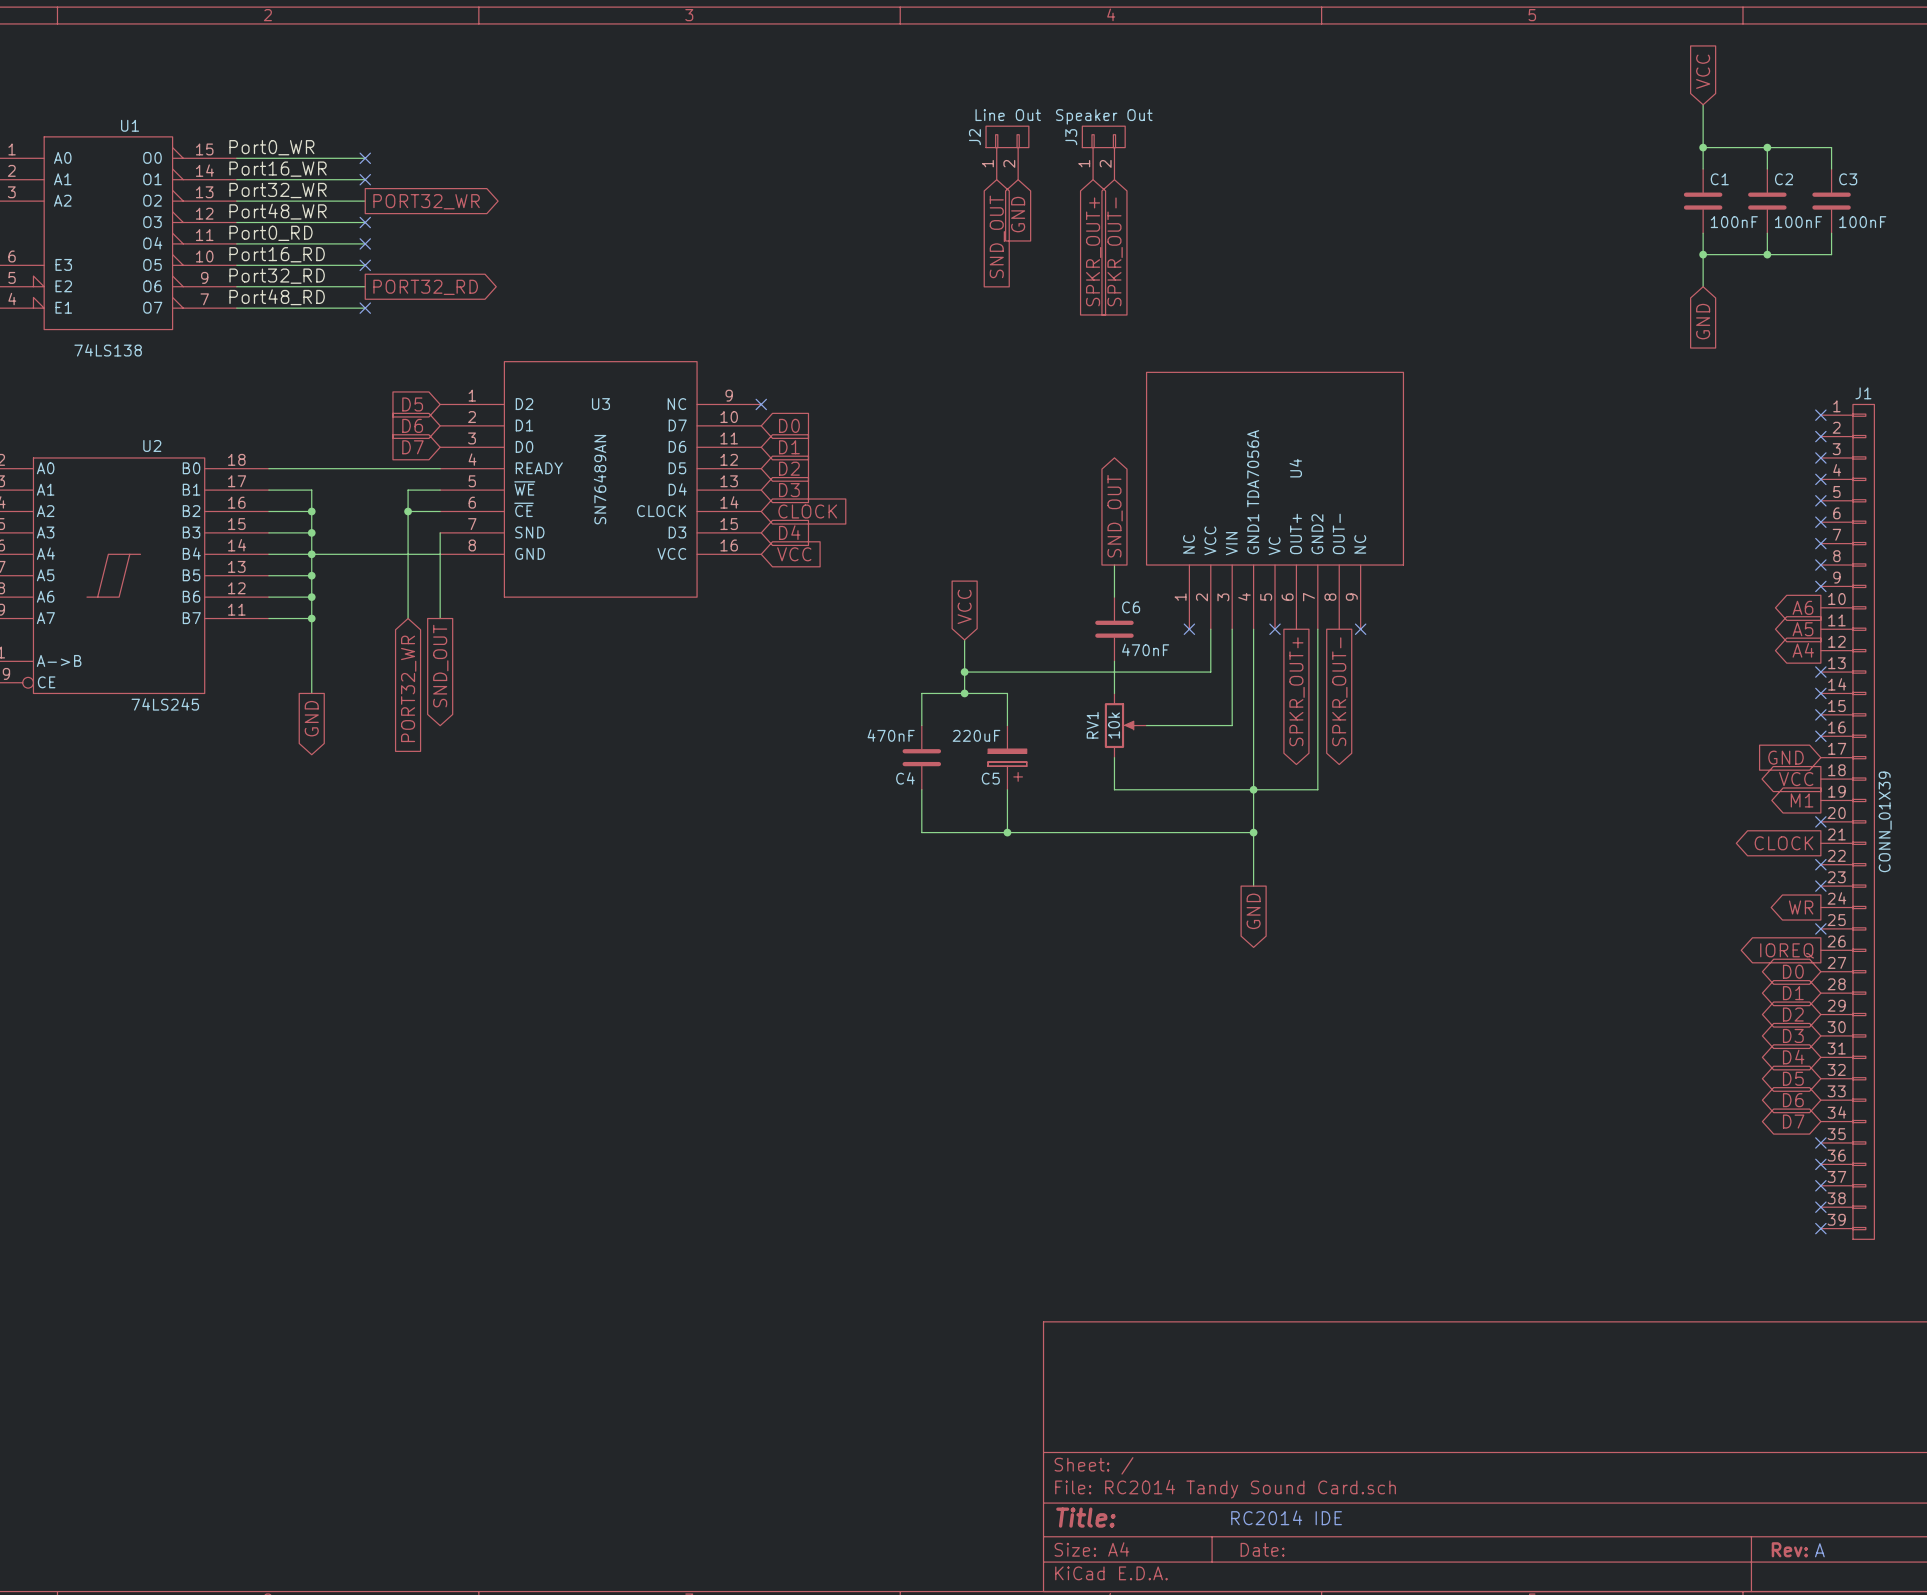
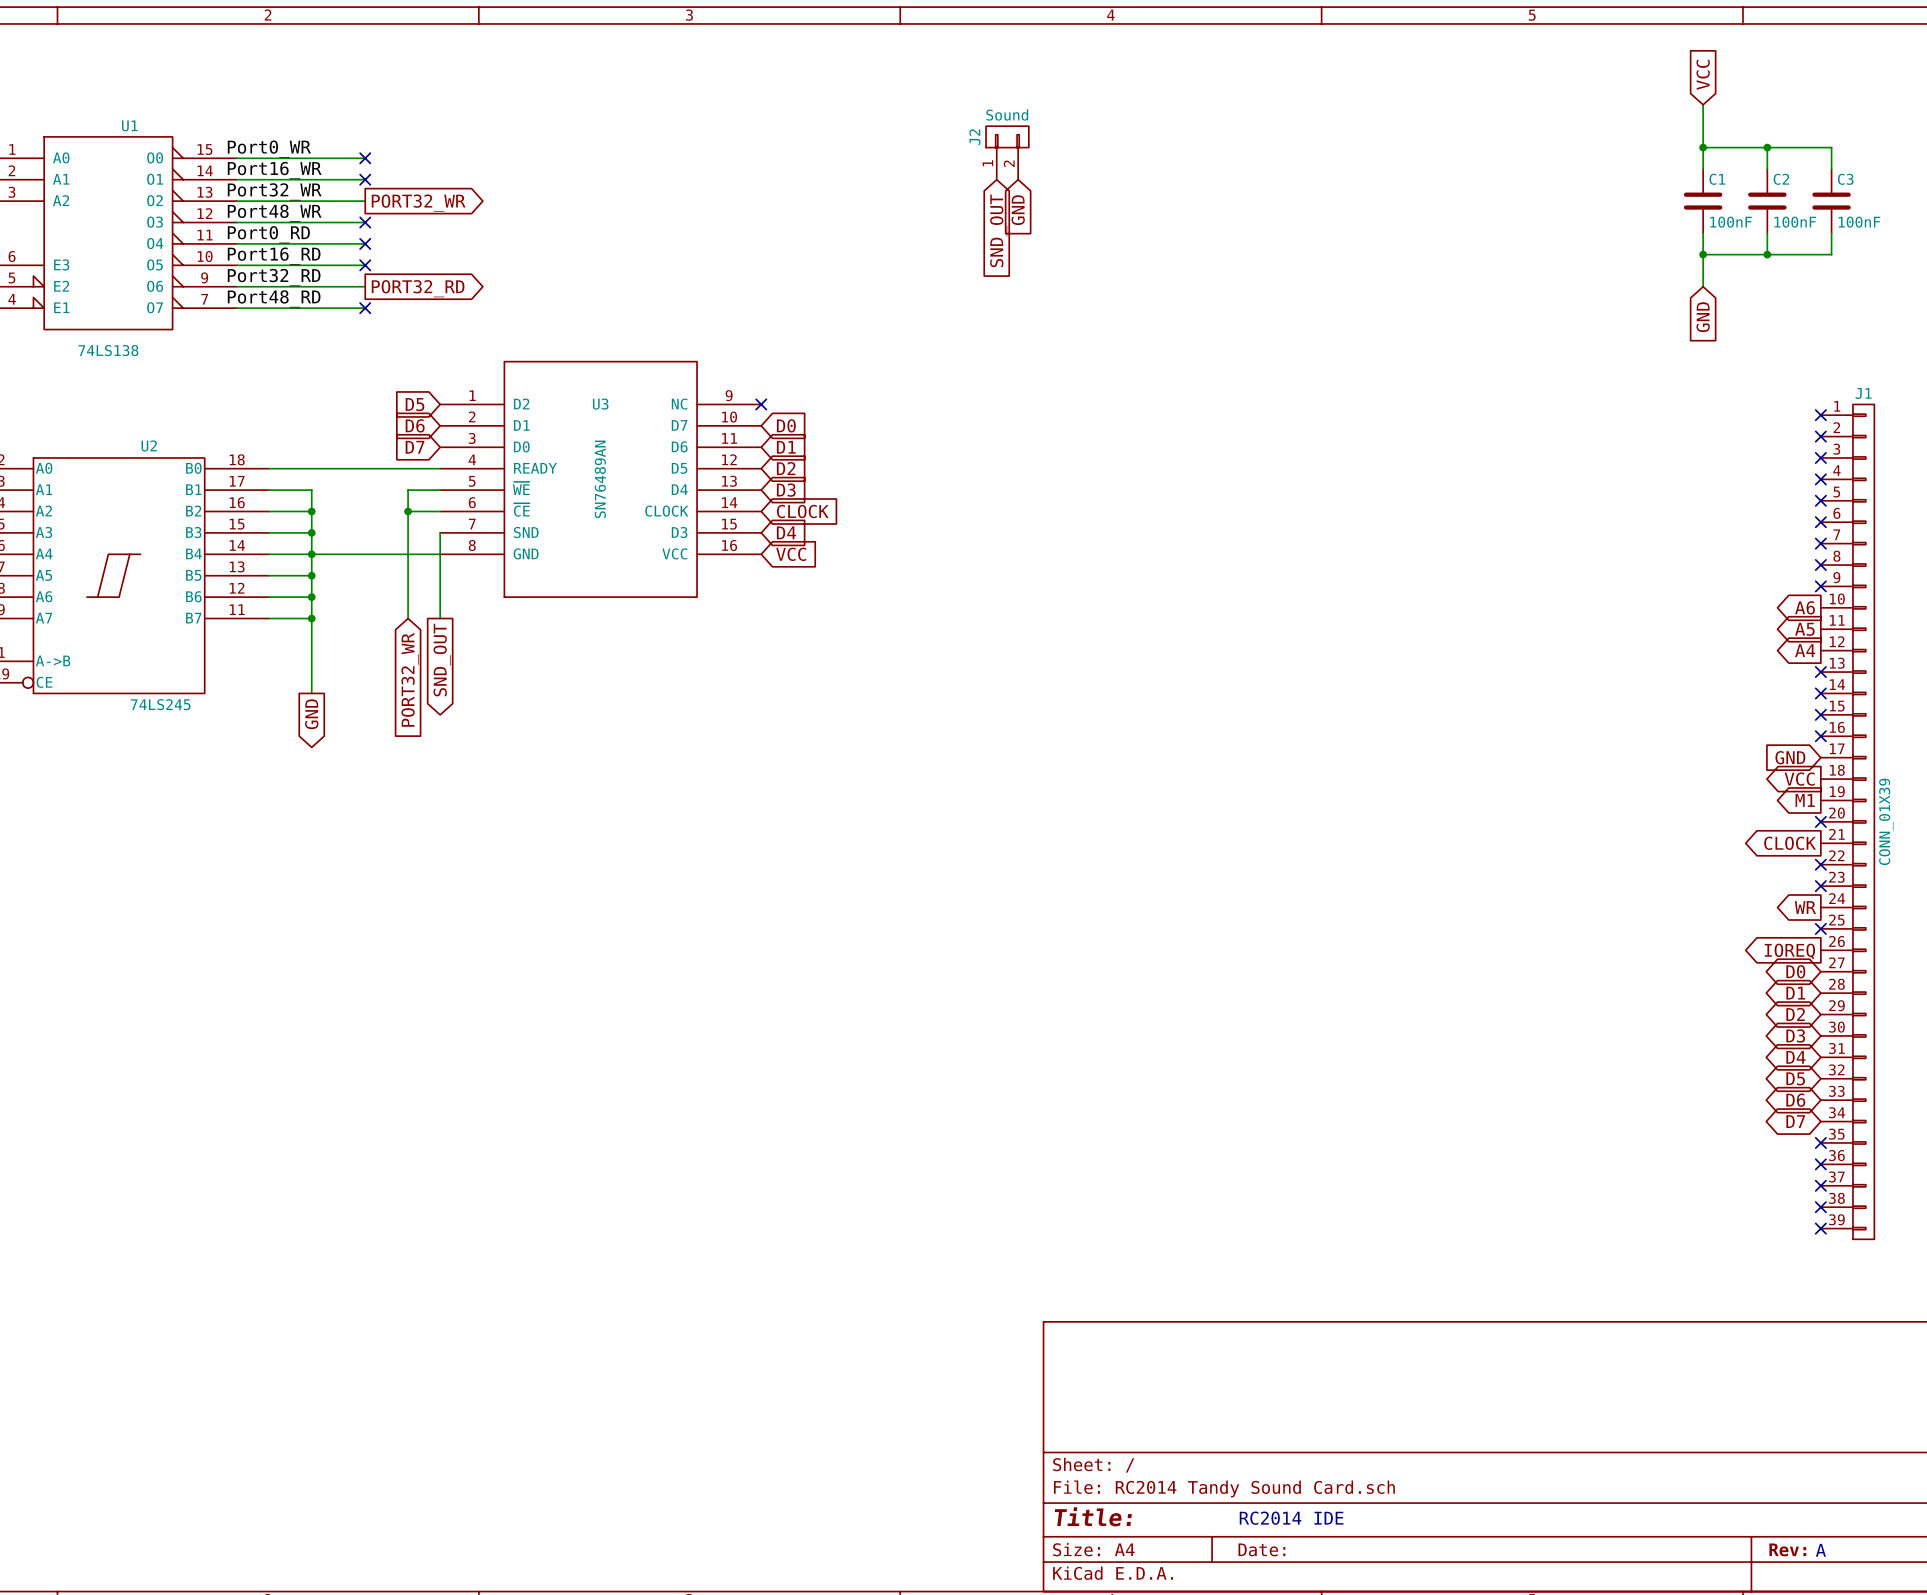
J2 value: Line Out (1008, 115) -> Sound (1007, 114)
J3: Speaker Out (1103, 152) -> none
global label: SPKR_OUT+ (1093, 251) -> none
global label: SPKR_OUT- (1115, 251) -> none
U4: TDA7056A (1275, 500) -> none
global label: SND_OUT (1115, 516) -> none
wire: (1114, 565) (1114, 597) -> none
global label: VCC (964, 606) -> none
C6: 470nF (1114, 629) -> none
no-connect mark: (1189, 629) -> none
wire: (1210, 629) (1210, 672) (964, 672) -> none
wire: (1232, 629) (1232, 725) (1146, 725) -> none
wire: (1253, 629) (1253, 886) -> none
no-connect mark: (1275, 629) -> none
wire: (1317, 629) (1317, 789) (1114, 789) (1114, 757) -> none
no-connect mark: (1360, 629) -> none
wire: (964, 639) (964, 693) -> none
wire: (1114, 661) (1114, 693) -> none
junction: (964, 672) -> none
global label: SPKR_OUT+ (1297, 691) -> none
global label: SPKR_OUT- (1339, 691) -> none
junction: (964, 693) -> none
wire: (921, 725) (921, 693) (1007, 693) (1007, 725) -> none
RV1: 10k (1125, 725) -> none
C4: 470nF (921, 757) -> none
C5: 220uF (1007, 757) -> none
wire: (921, 789) (921, 832) (1253, 832) -> none
wire: (1007, 789) (1007, 832) -> none
junction: (1253, 789) -> none
junction: (1007, 832) -> none
junction: (1253, 832) -> none
global label: GND (1253, 911) -> none

